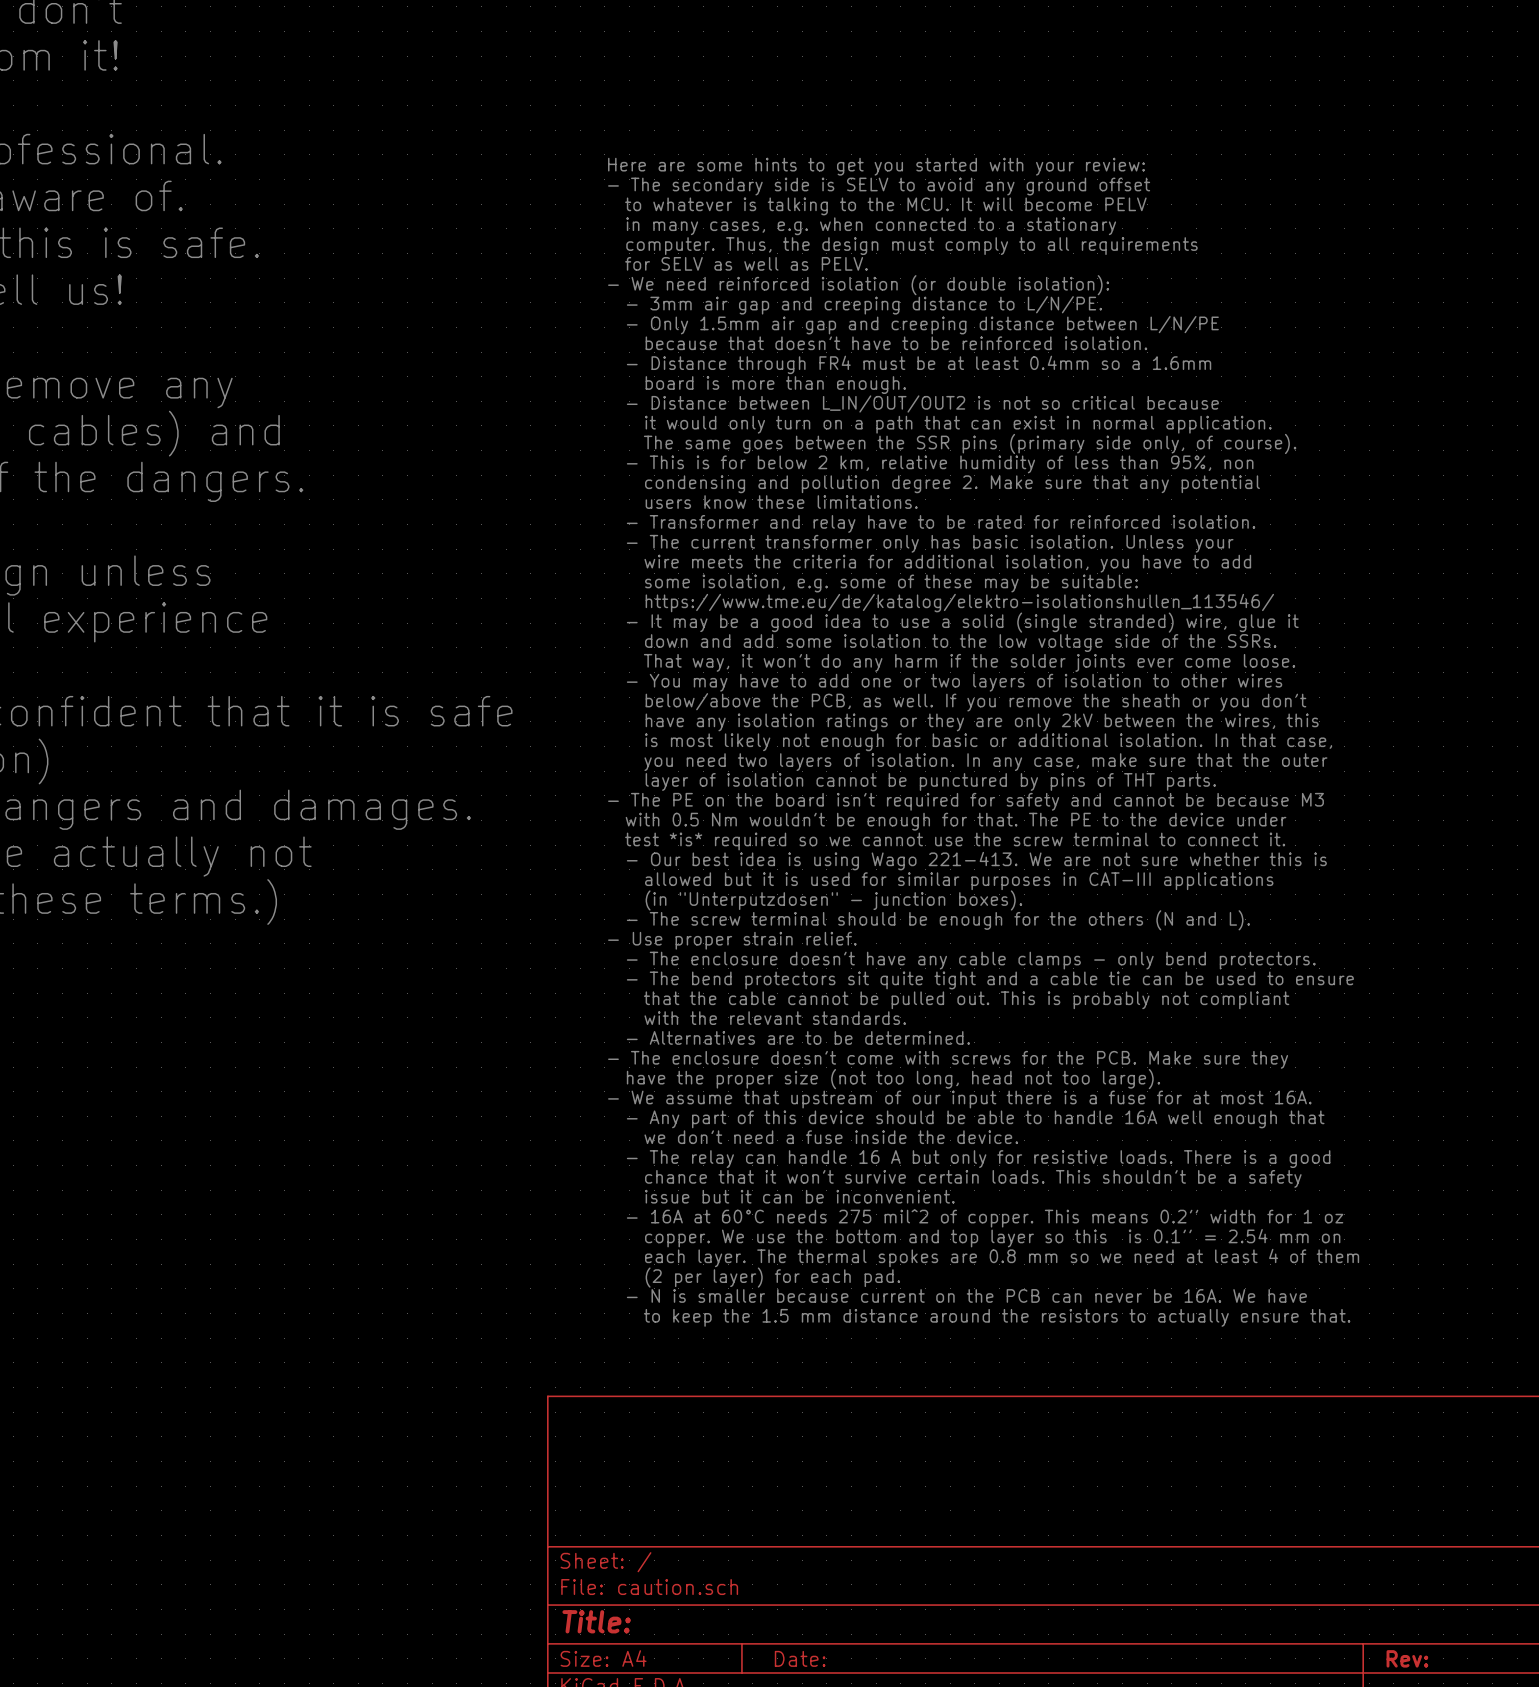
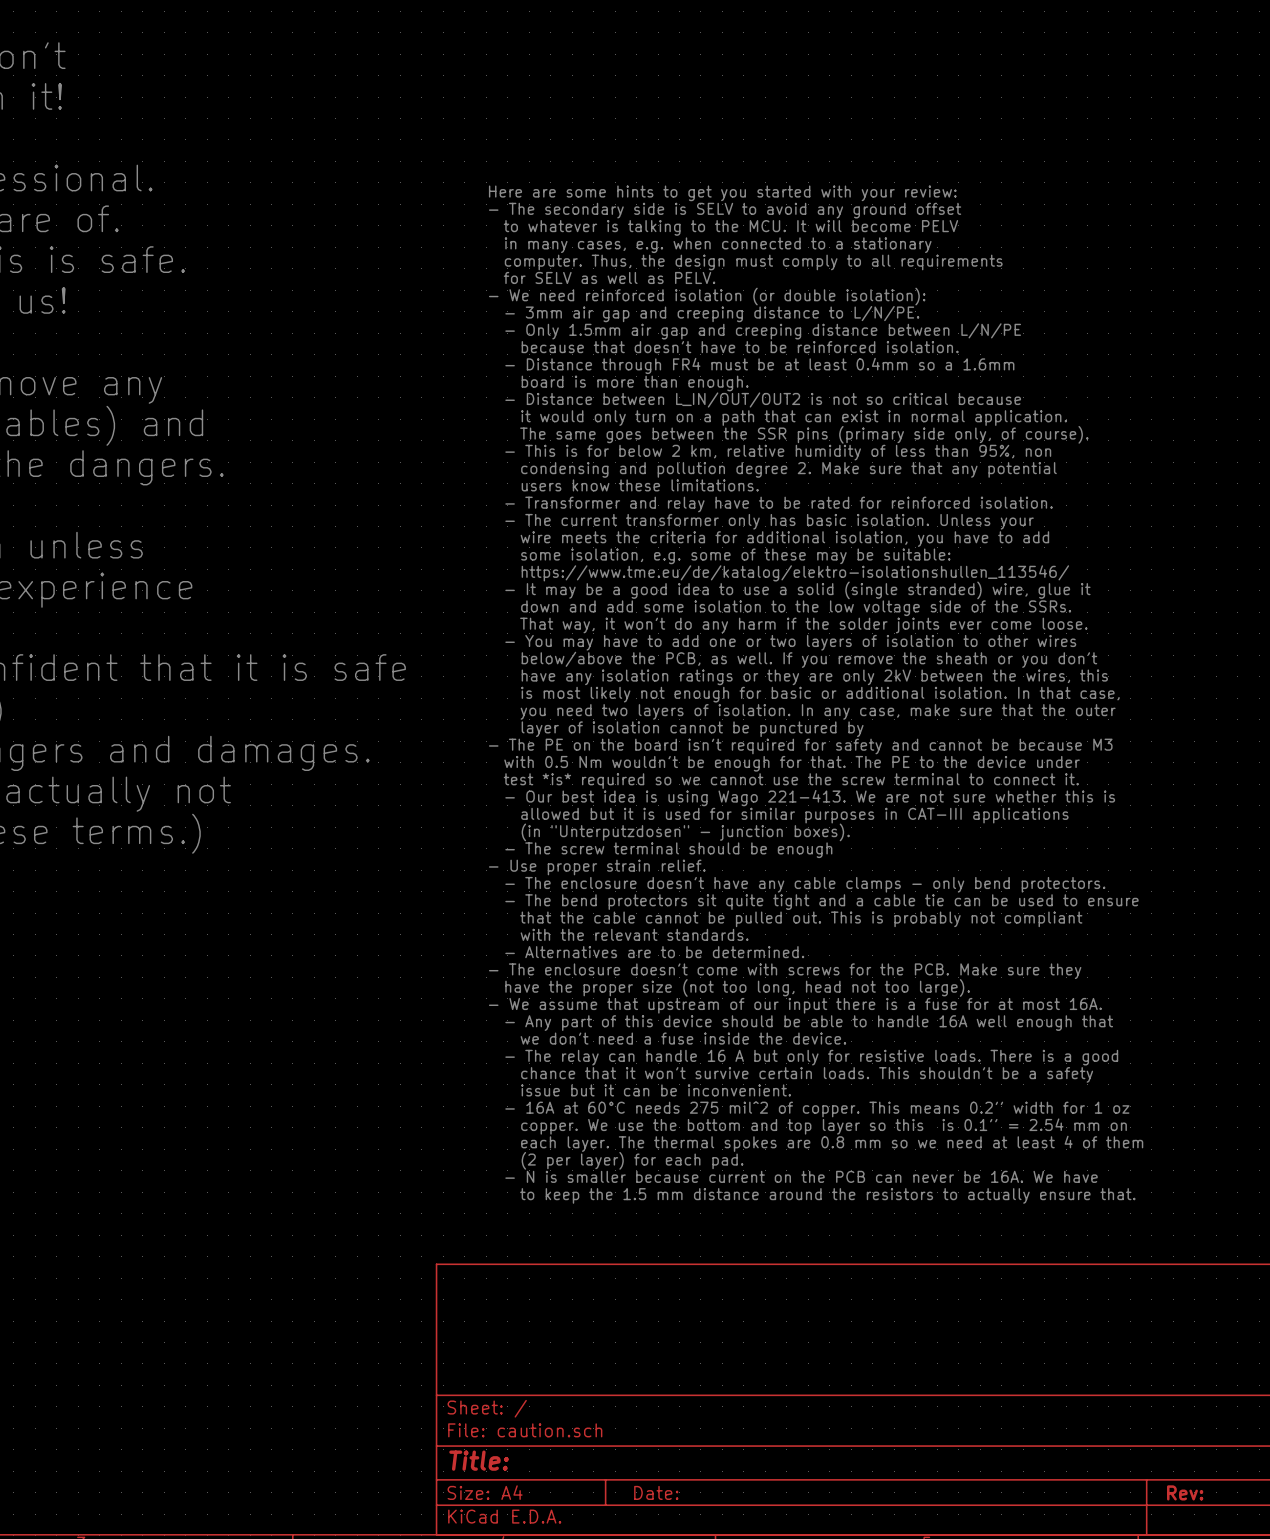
text: layer of isolation cannot be punctured by pins of THT parts. (930, 781) -> layer of isolation cannot be punctured by (692, 729)
text: - The screw terminal should be enough for the others (N and L). (938, 920) -> - The screw terminal should be enough (668, 850)

